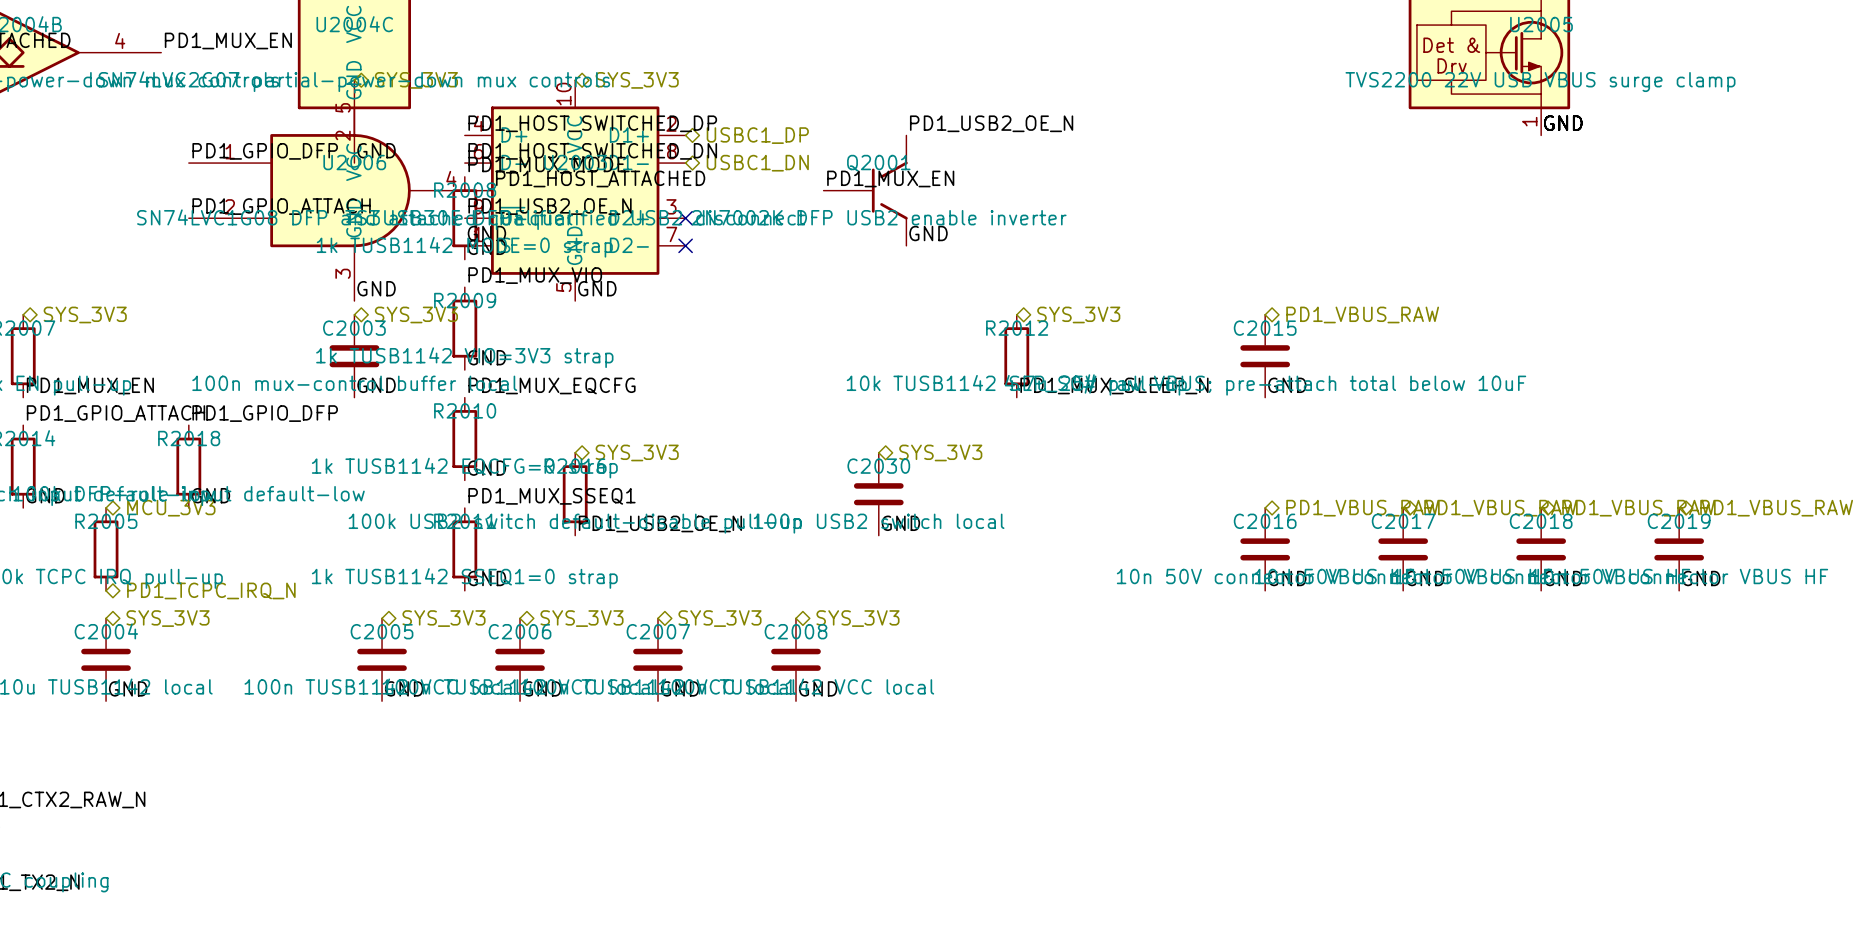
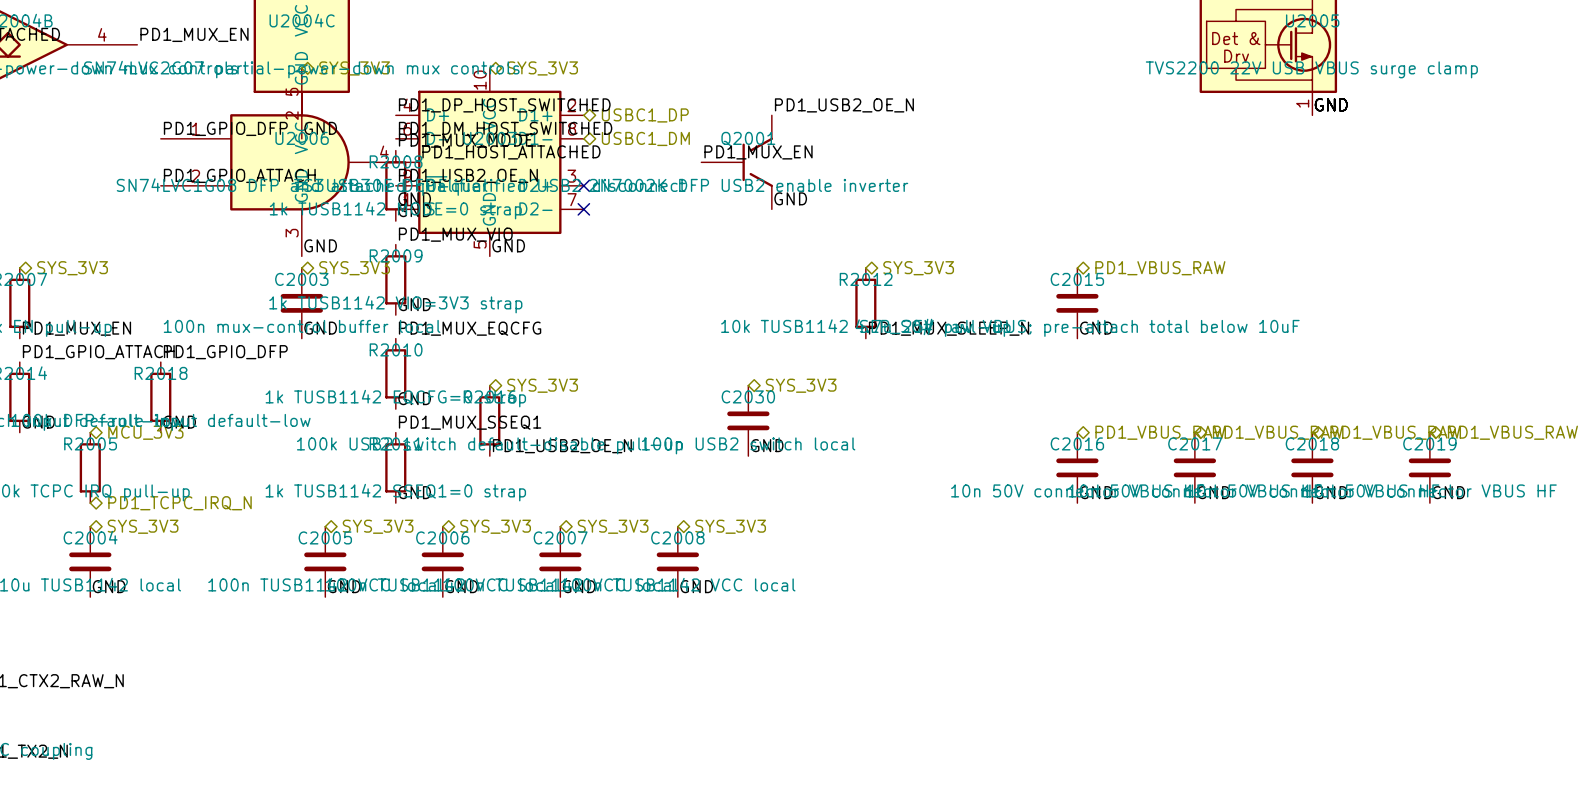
label: PD1_HOST_SWITCHED_DP (592, 123) -> PD1_DP_HOST_SWITCHED (504, 105)
label: PD1_HOST_SWITCHED_DN (592, 151) -> PD1_DM_HOST_SWITCHED (505, 128)
hierarchical label: USBC1_DN (757, 163) -> USBC1_DM (645, 138)

